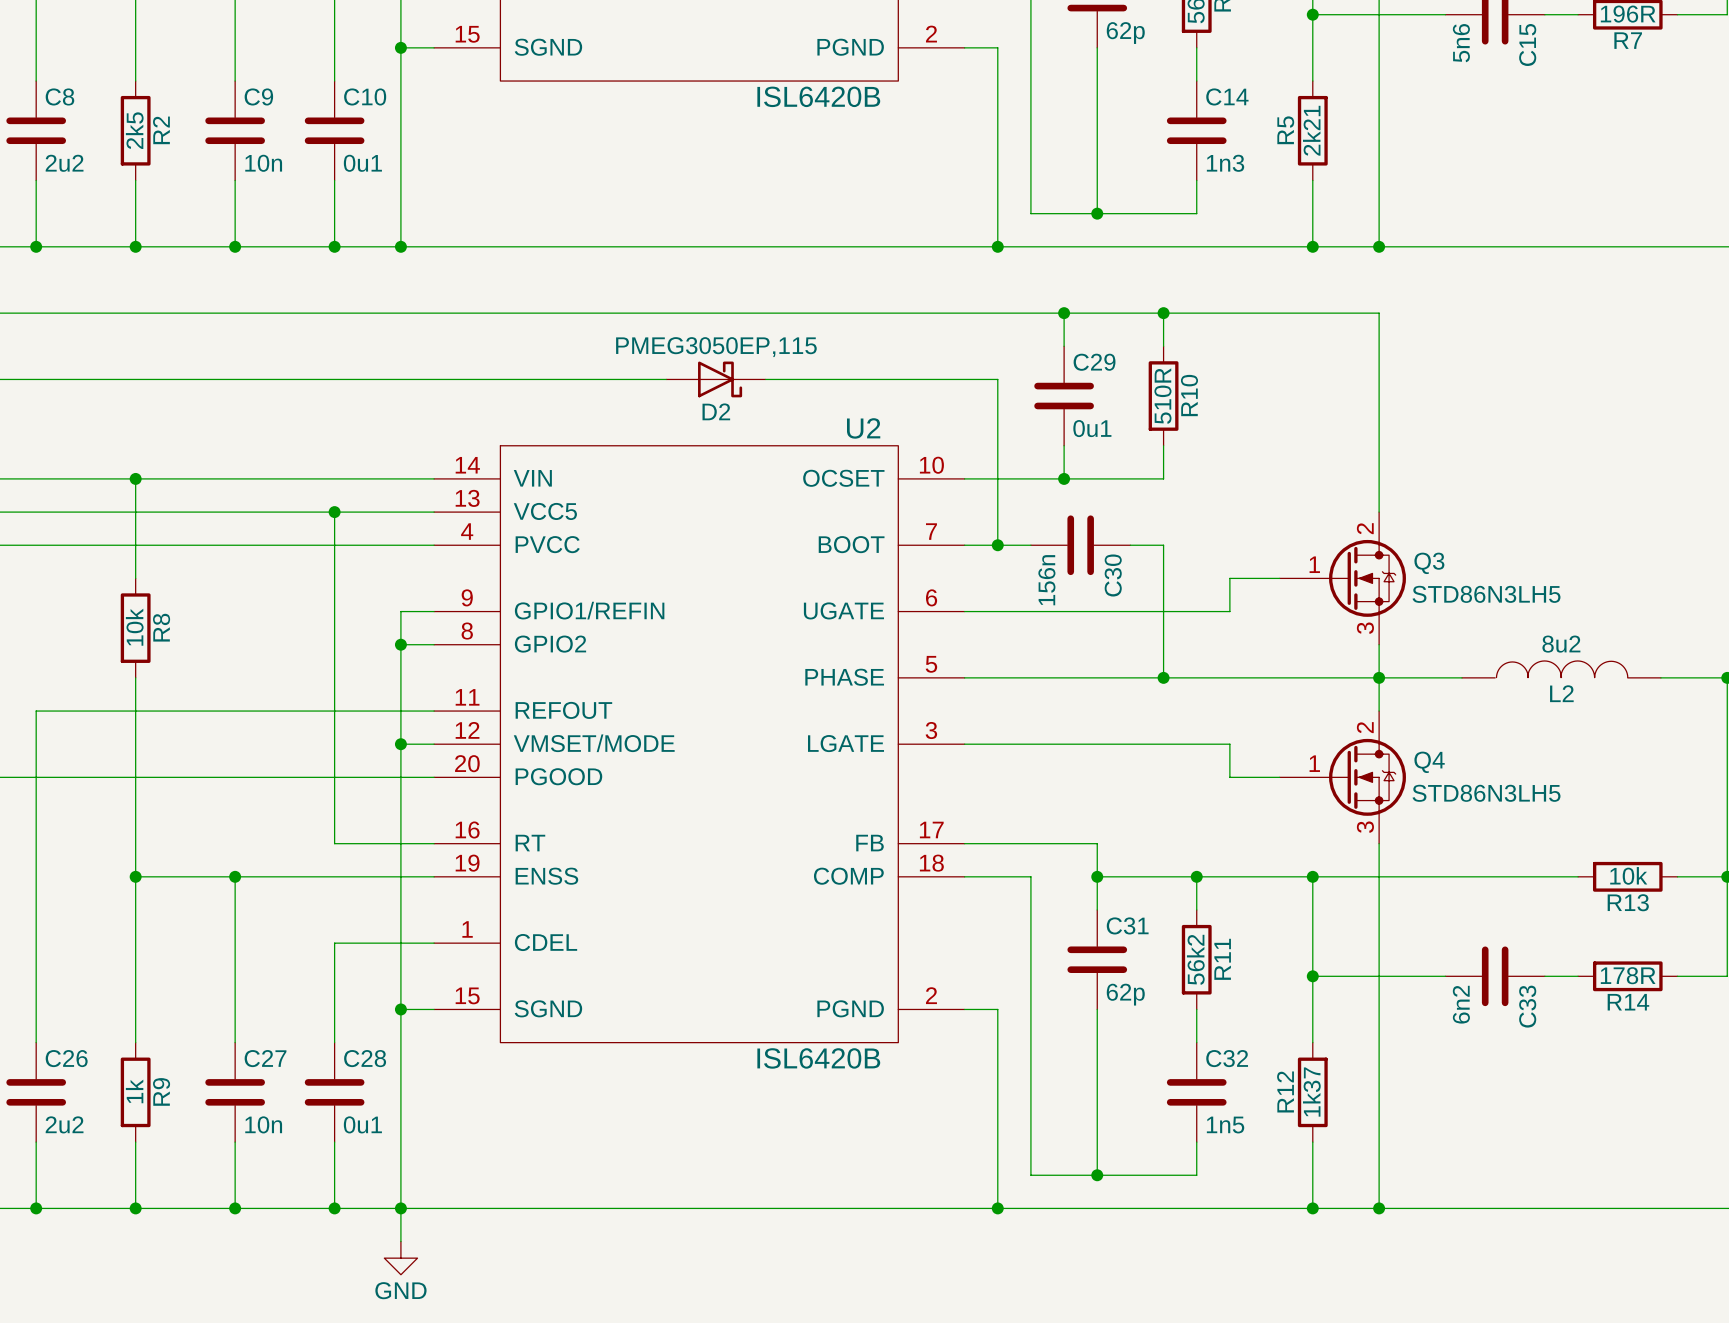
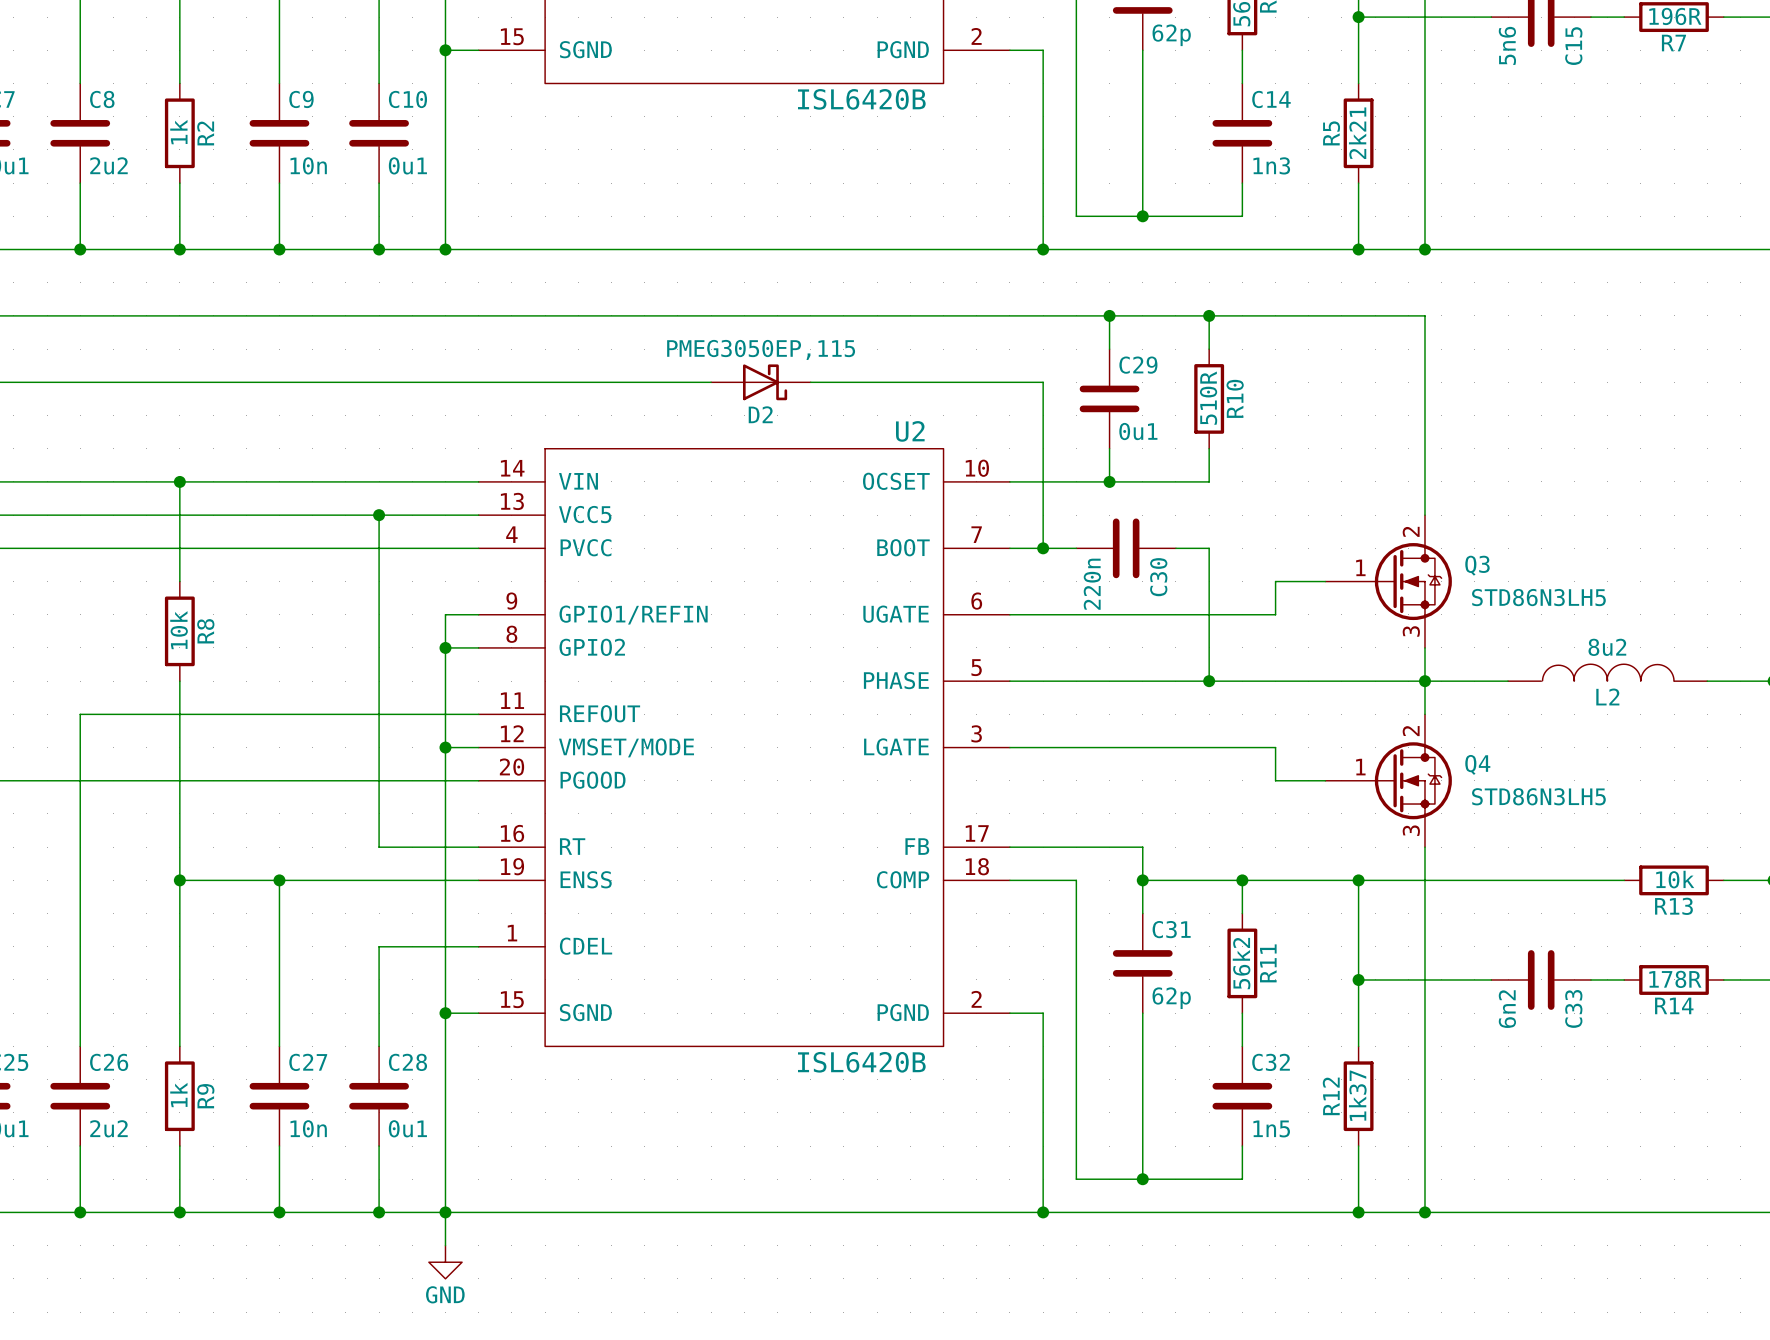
R2 value: 2k5 (134, 130) -> 1k (178, 132)
C30 value: 156n (1046, 580) -> 220n (1092, 584)

